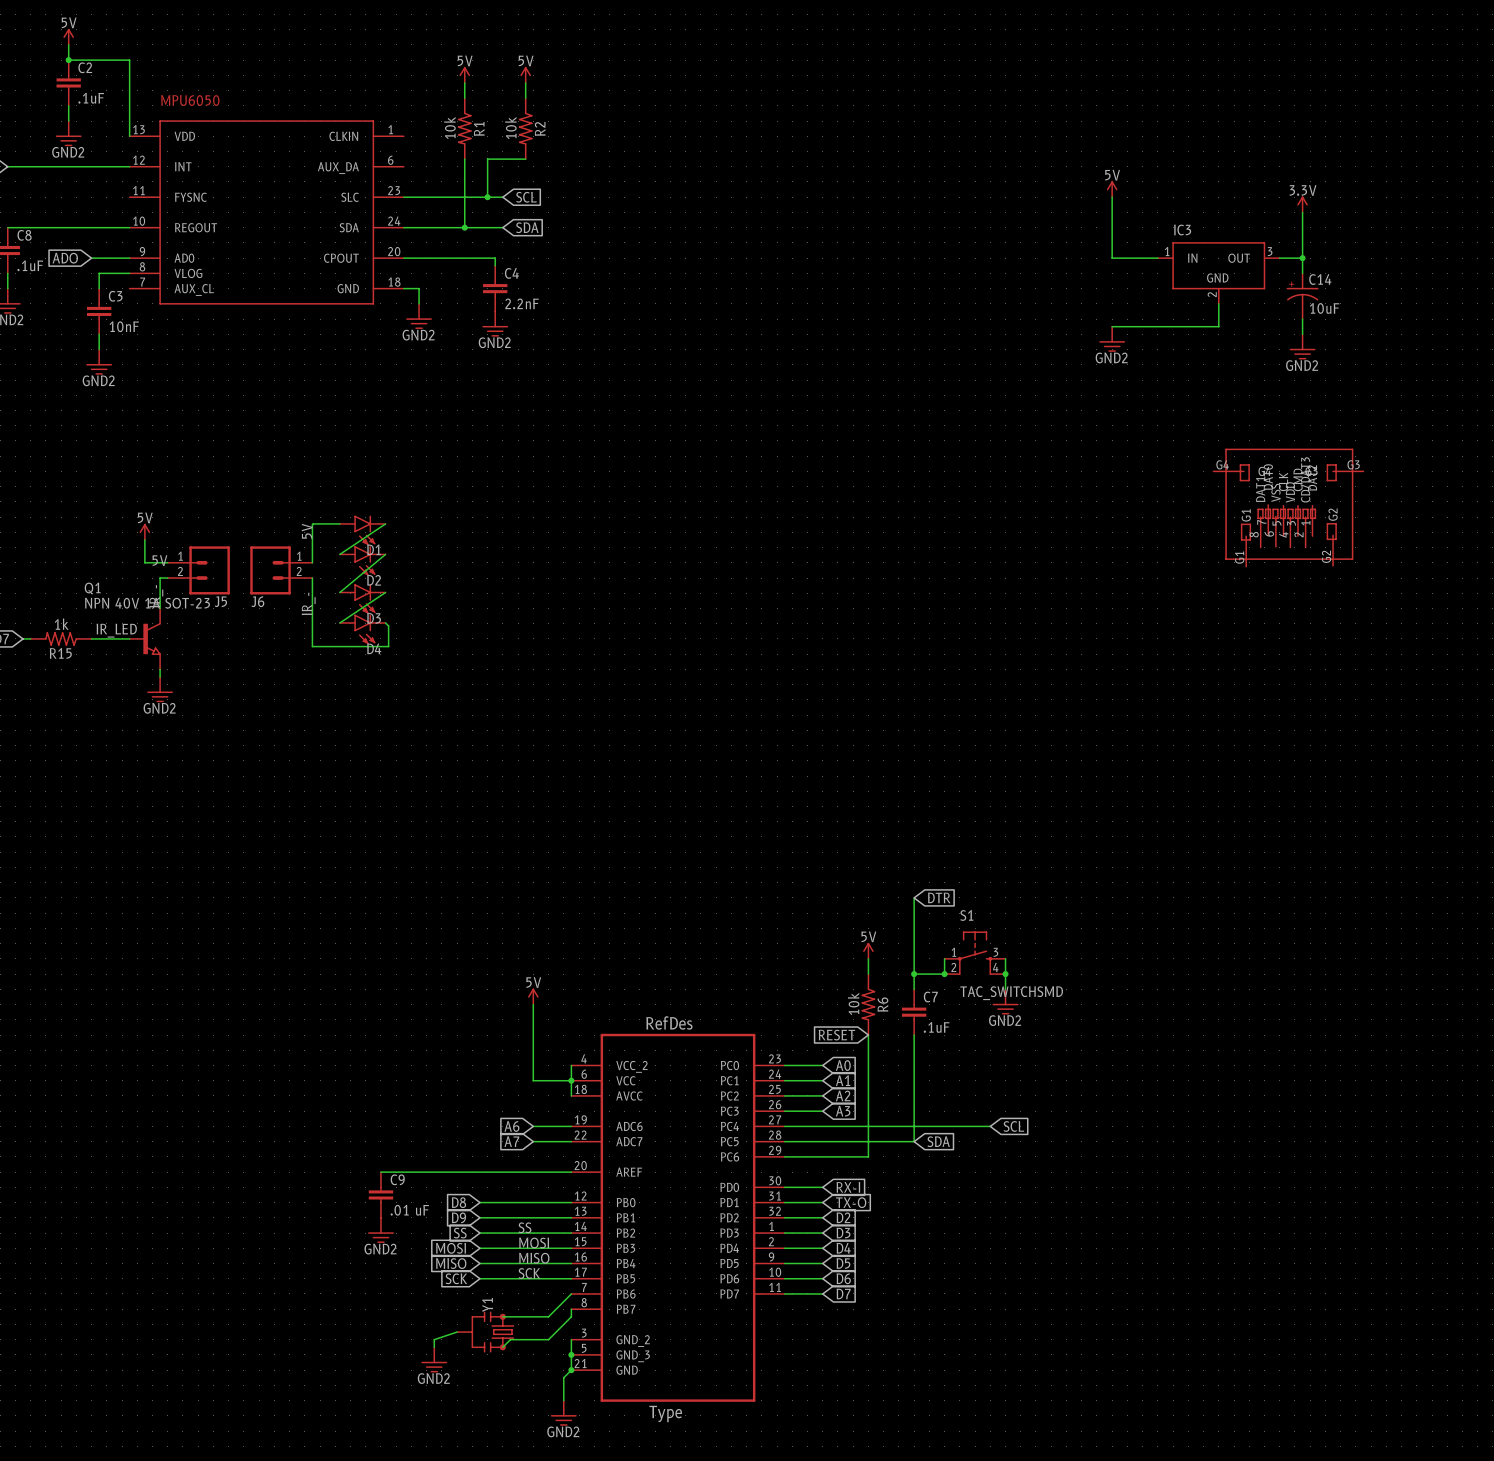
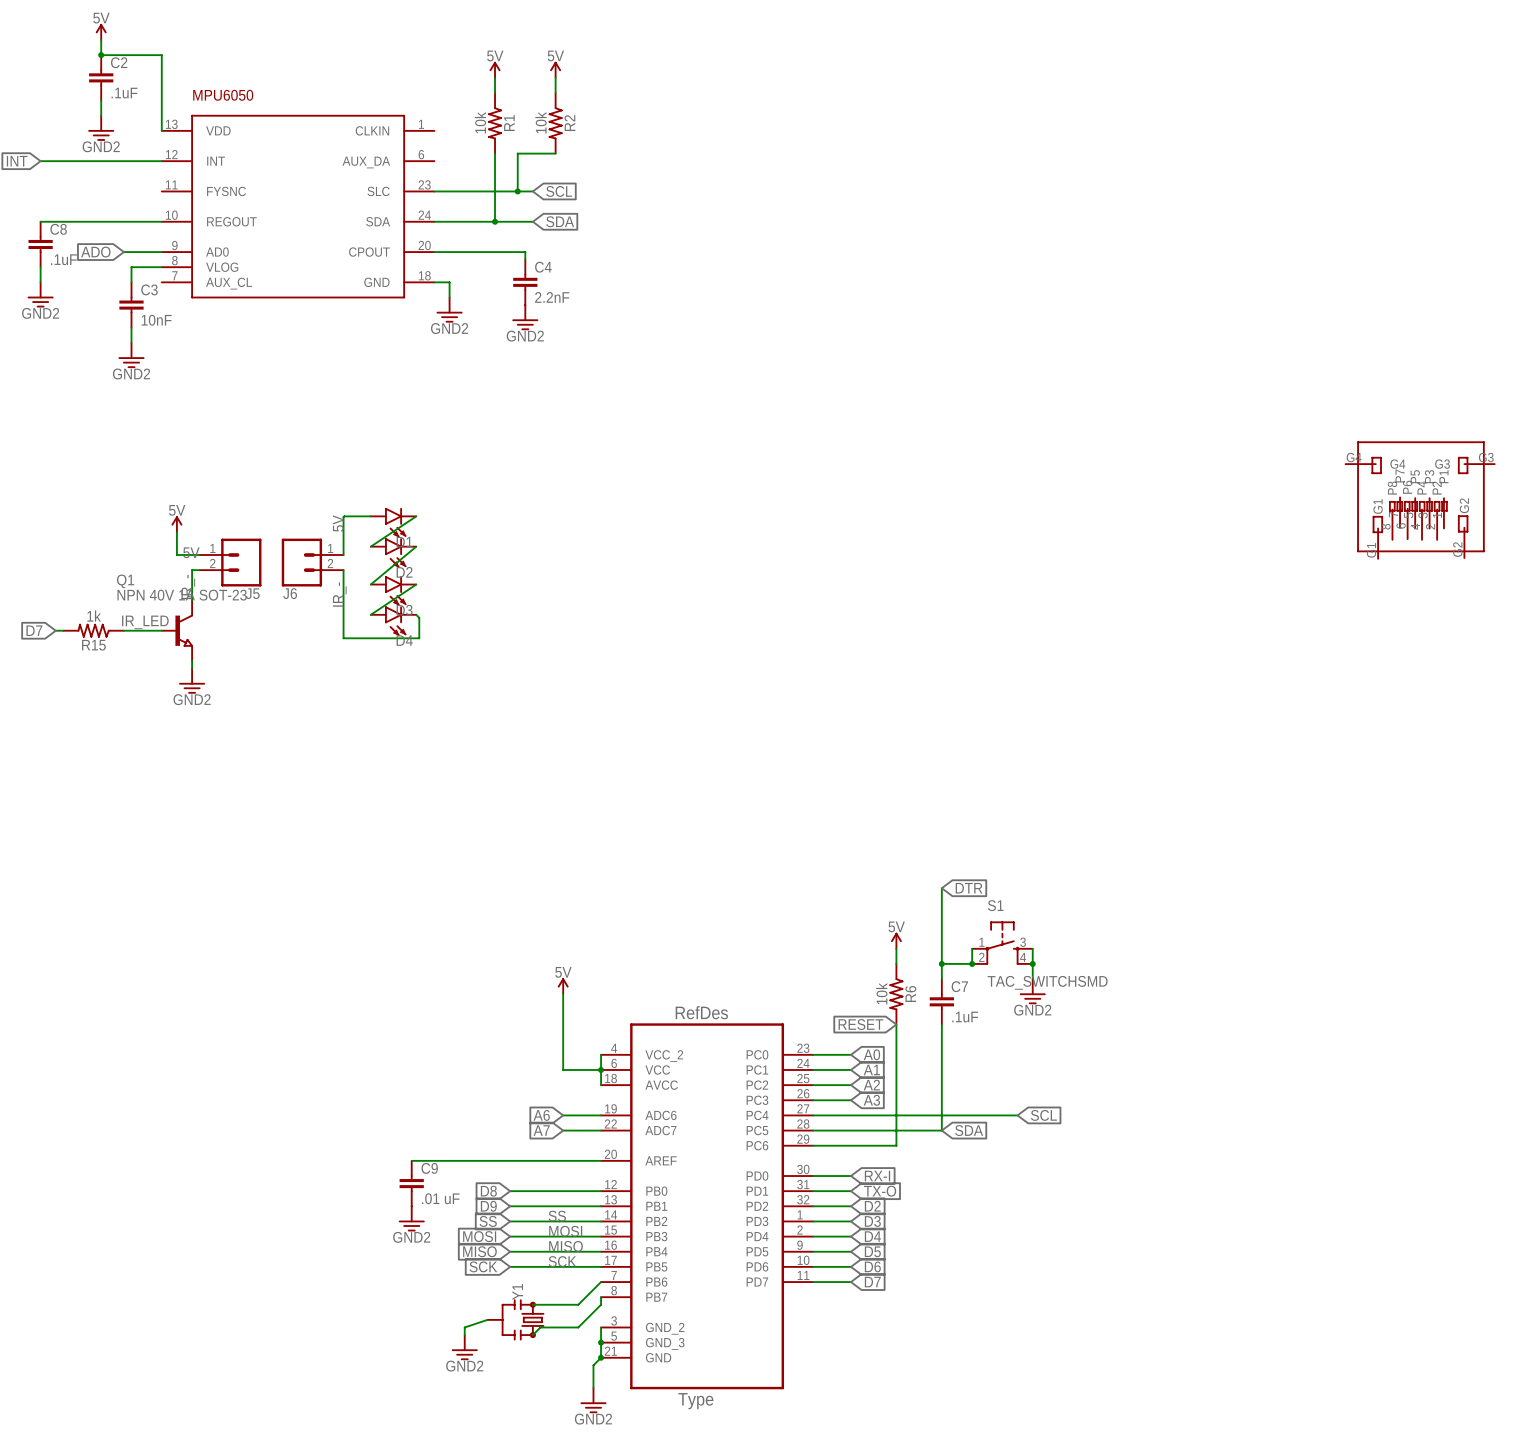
power symbol: 5V (1112, 189) -> none
wire: (1112, 197) (1112, 258) (1157, 258) -> none
power symbol: 3.3V (1302, 204) -> none
wire: (1302, 212) (1302, 273) -> none
wire: (1279, 258) (1302, 258) -> none
junction: (1302, 258) -> none
IC3: (1218, 272) -> none
C14: 10uF (1302, 296) -> none
wire: (1218, 303) (1218, 326) (1112, 326) -> none
wire: (1302, 319) (1302, 334) -> none
power symbol: GND2 (1112, 339) -> none
power symbol: GND2 (1302, 346) -> none
part: (1288, 507) -> none
part: none -> (1420, 500)

